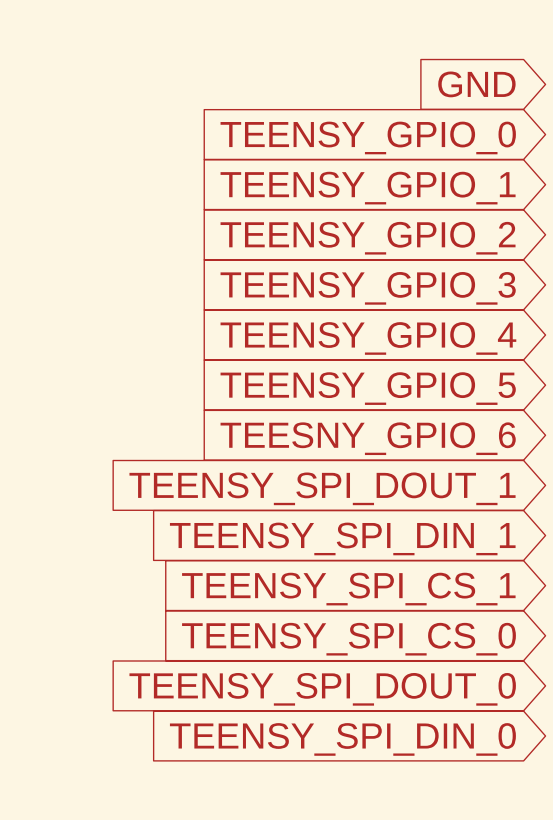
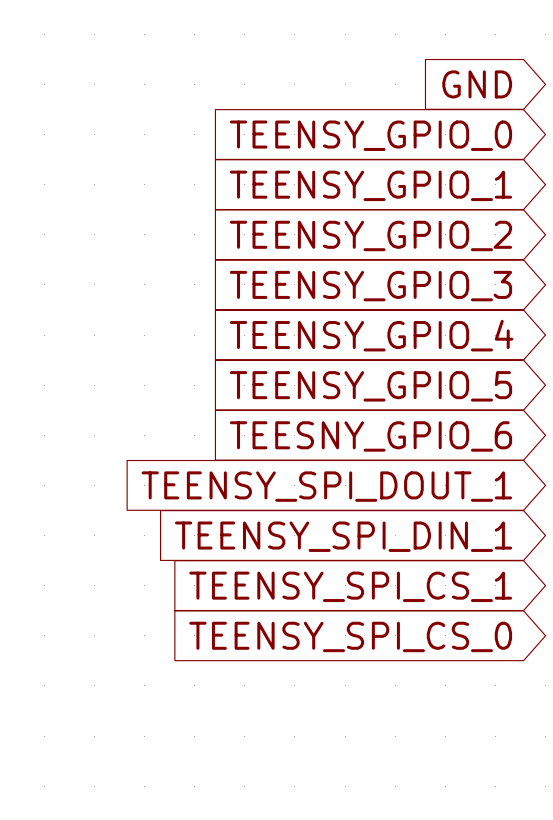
global label: TEENSY_SPI_DOUT_0 (322, 689) -> none
global label: TEENSY_SPI_DIN_0 (342, 739) -> none

